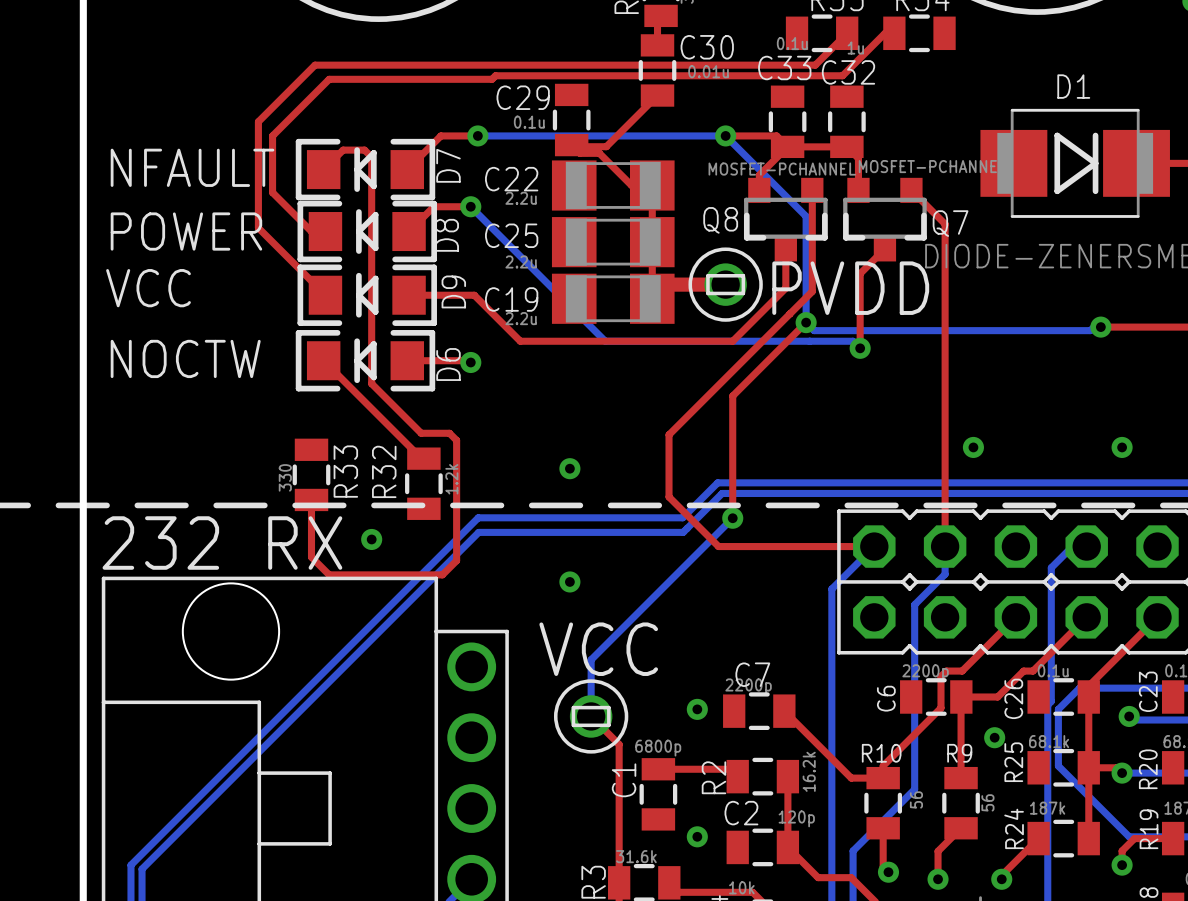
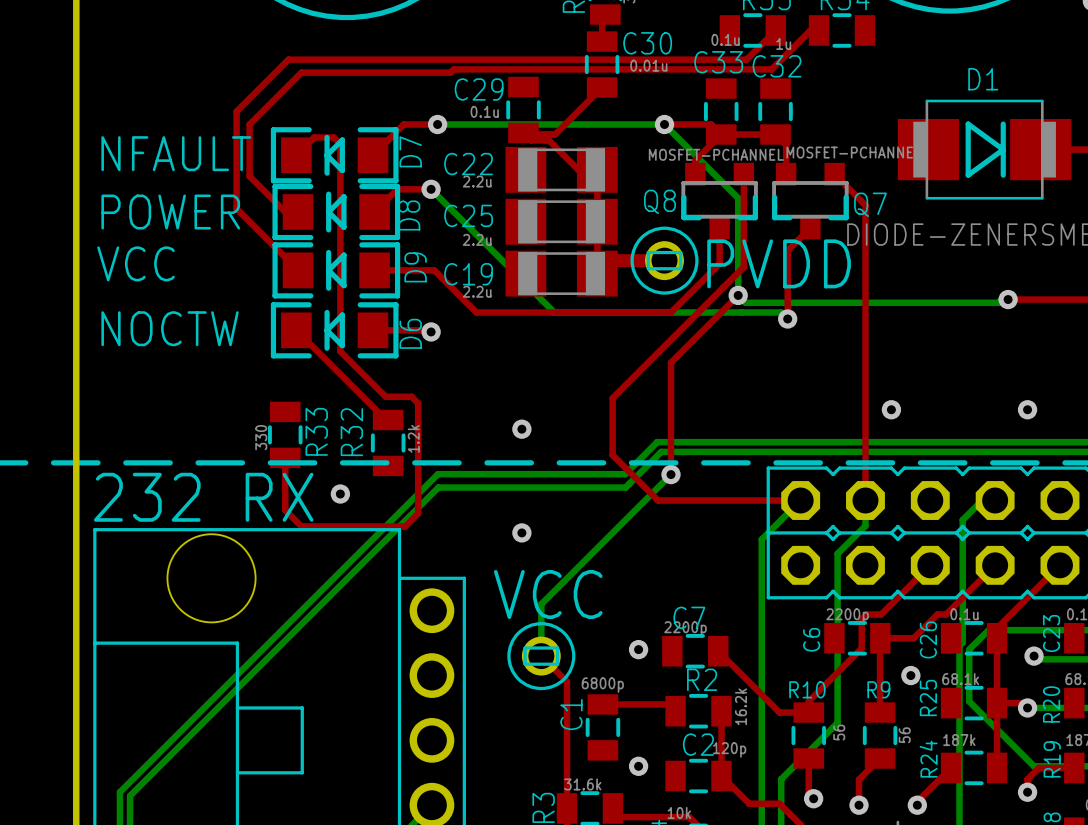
R2 name rotation: 0° (713, 777) -> 90° clockwise (702, 679)
R2 name position: R2 (713, 777) -> R2 (702, 679)
C2 name position: C2 (741, 813) -> C2 (698, 744)

